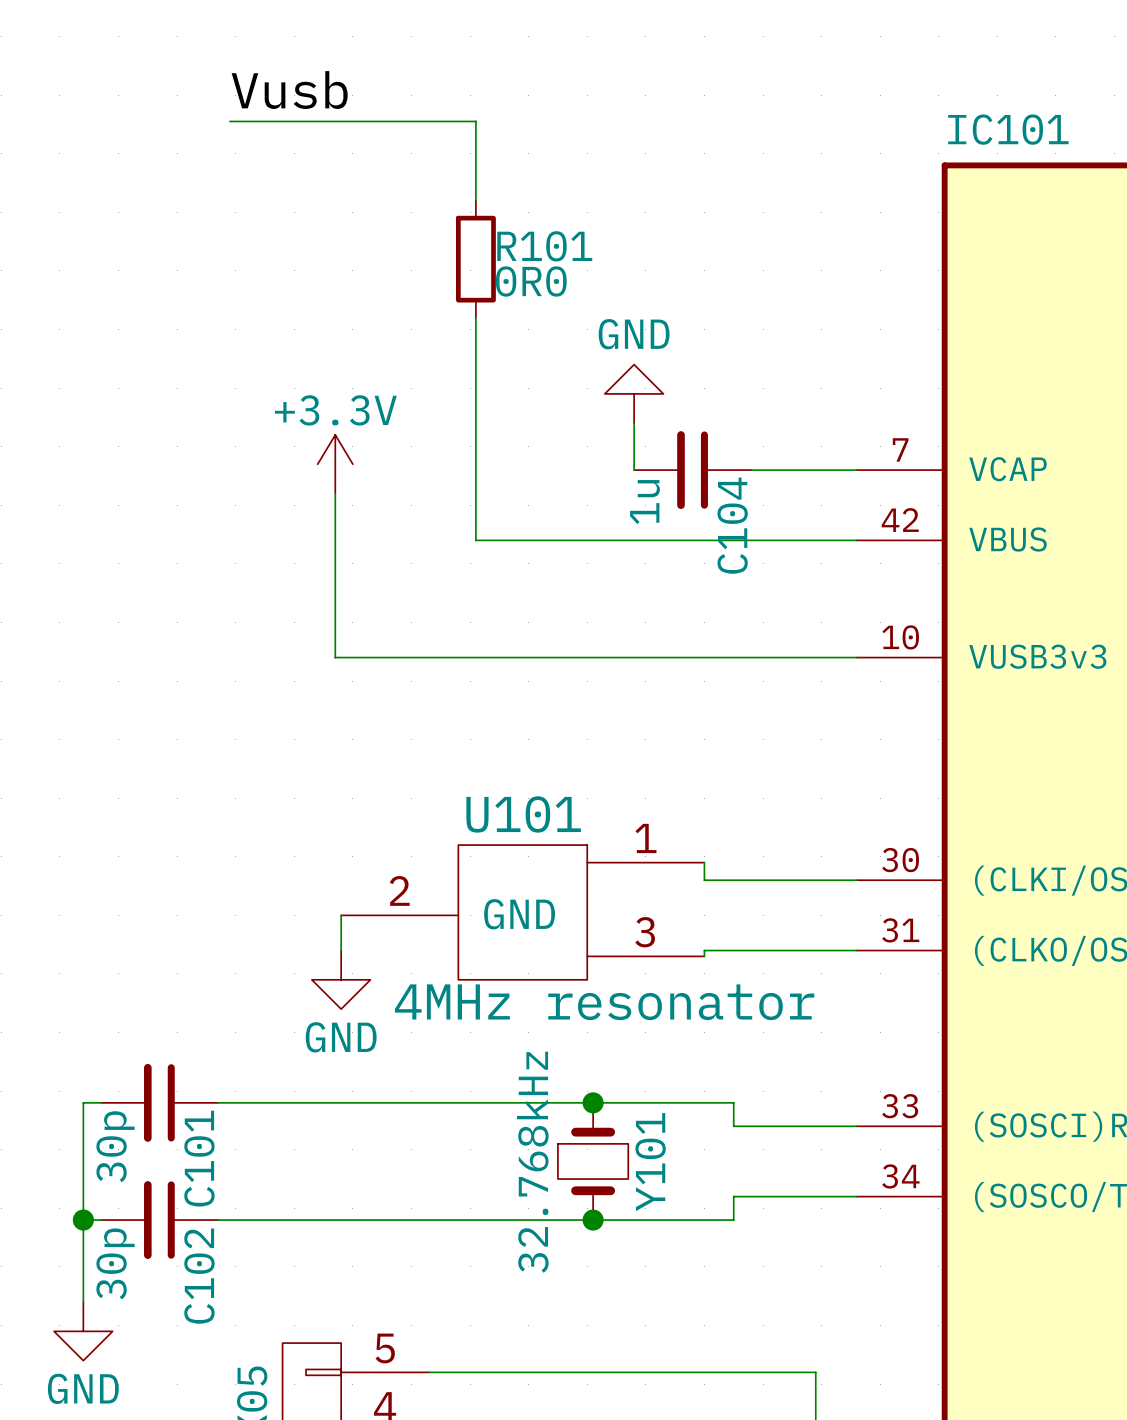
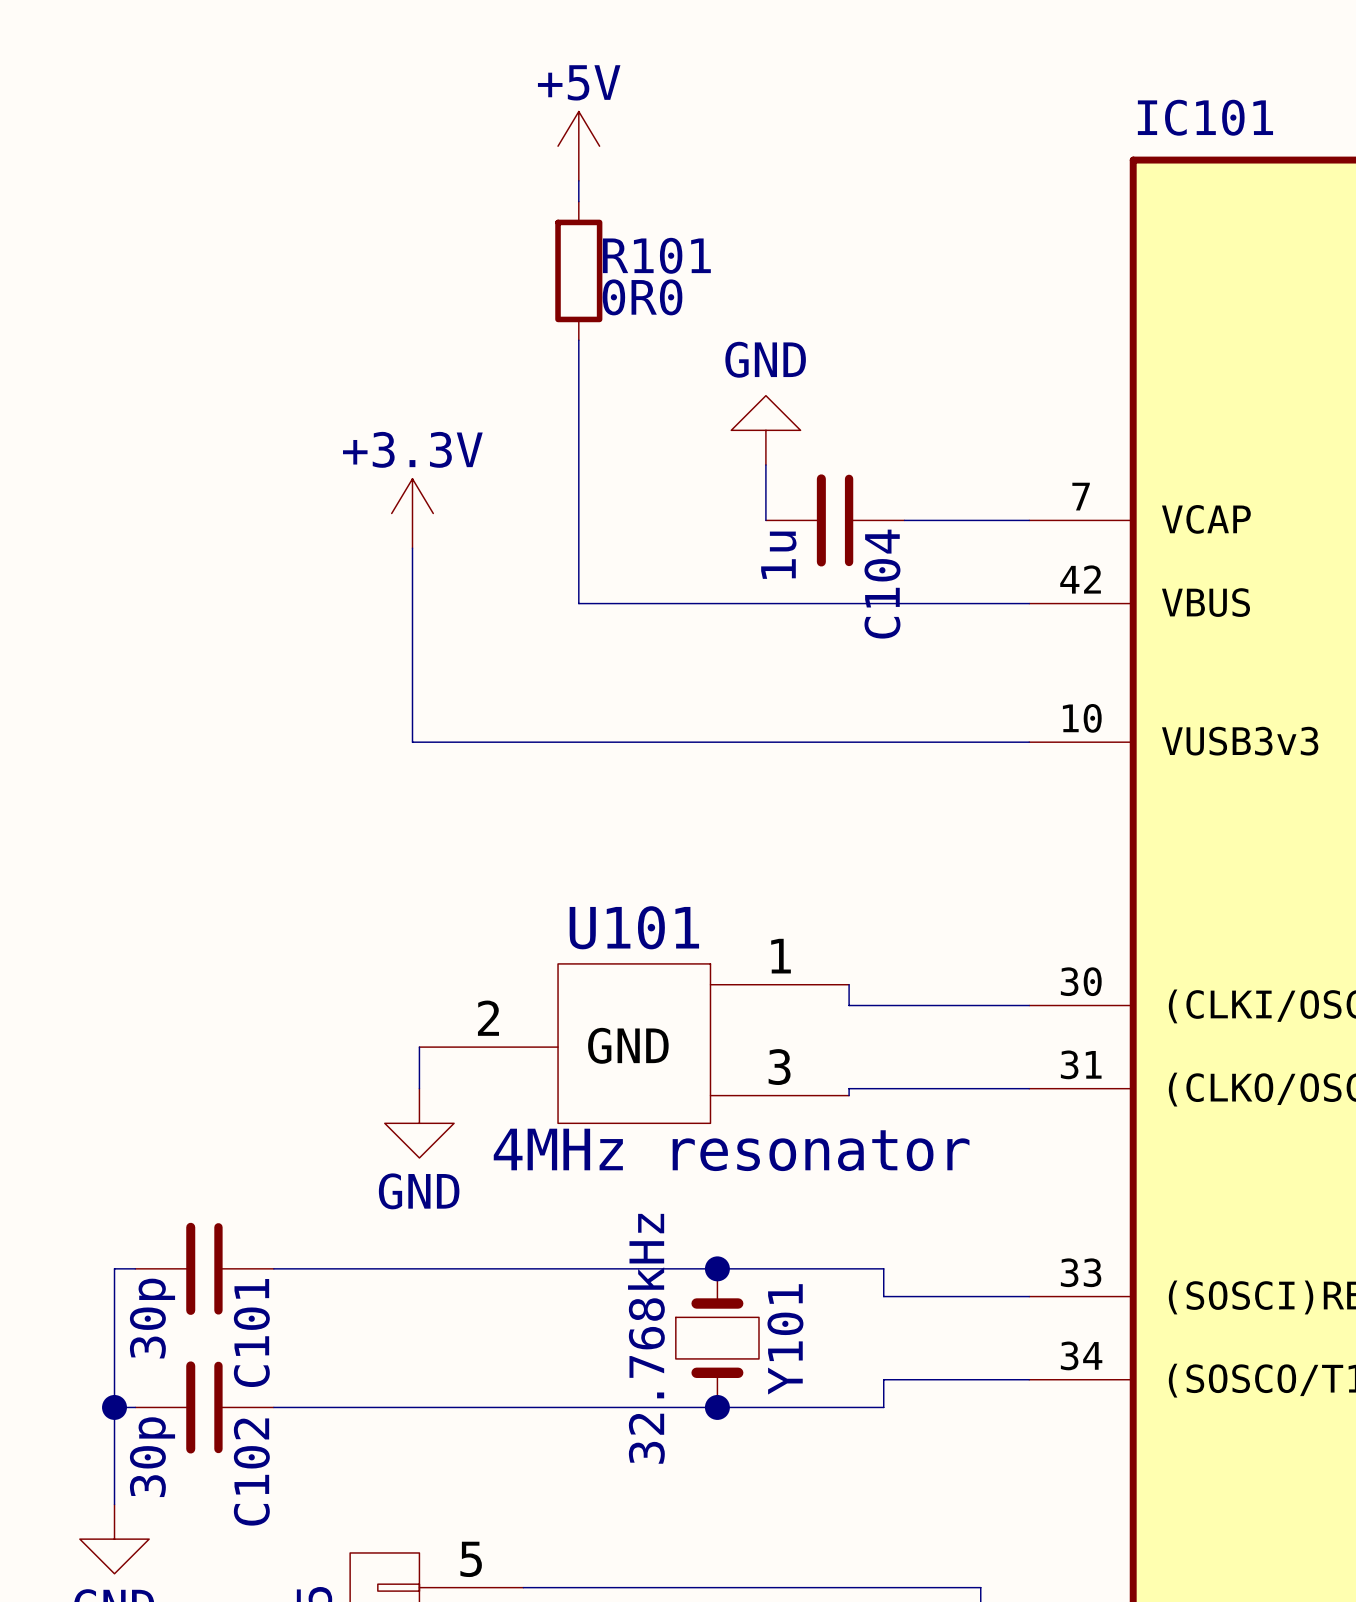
label: Vusb (289, 90) -> none
wire: (229, 121) (475, 121) (475, 182) -> none
power symbol: none -> +5V (578, 146)

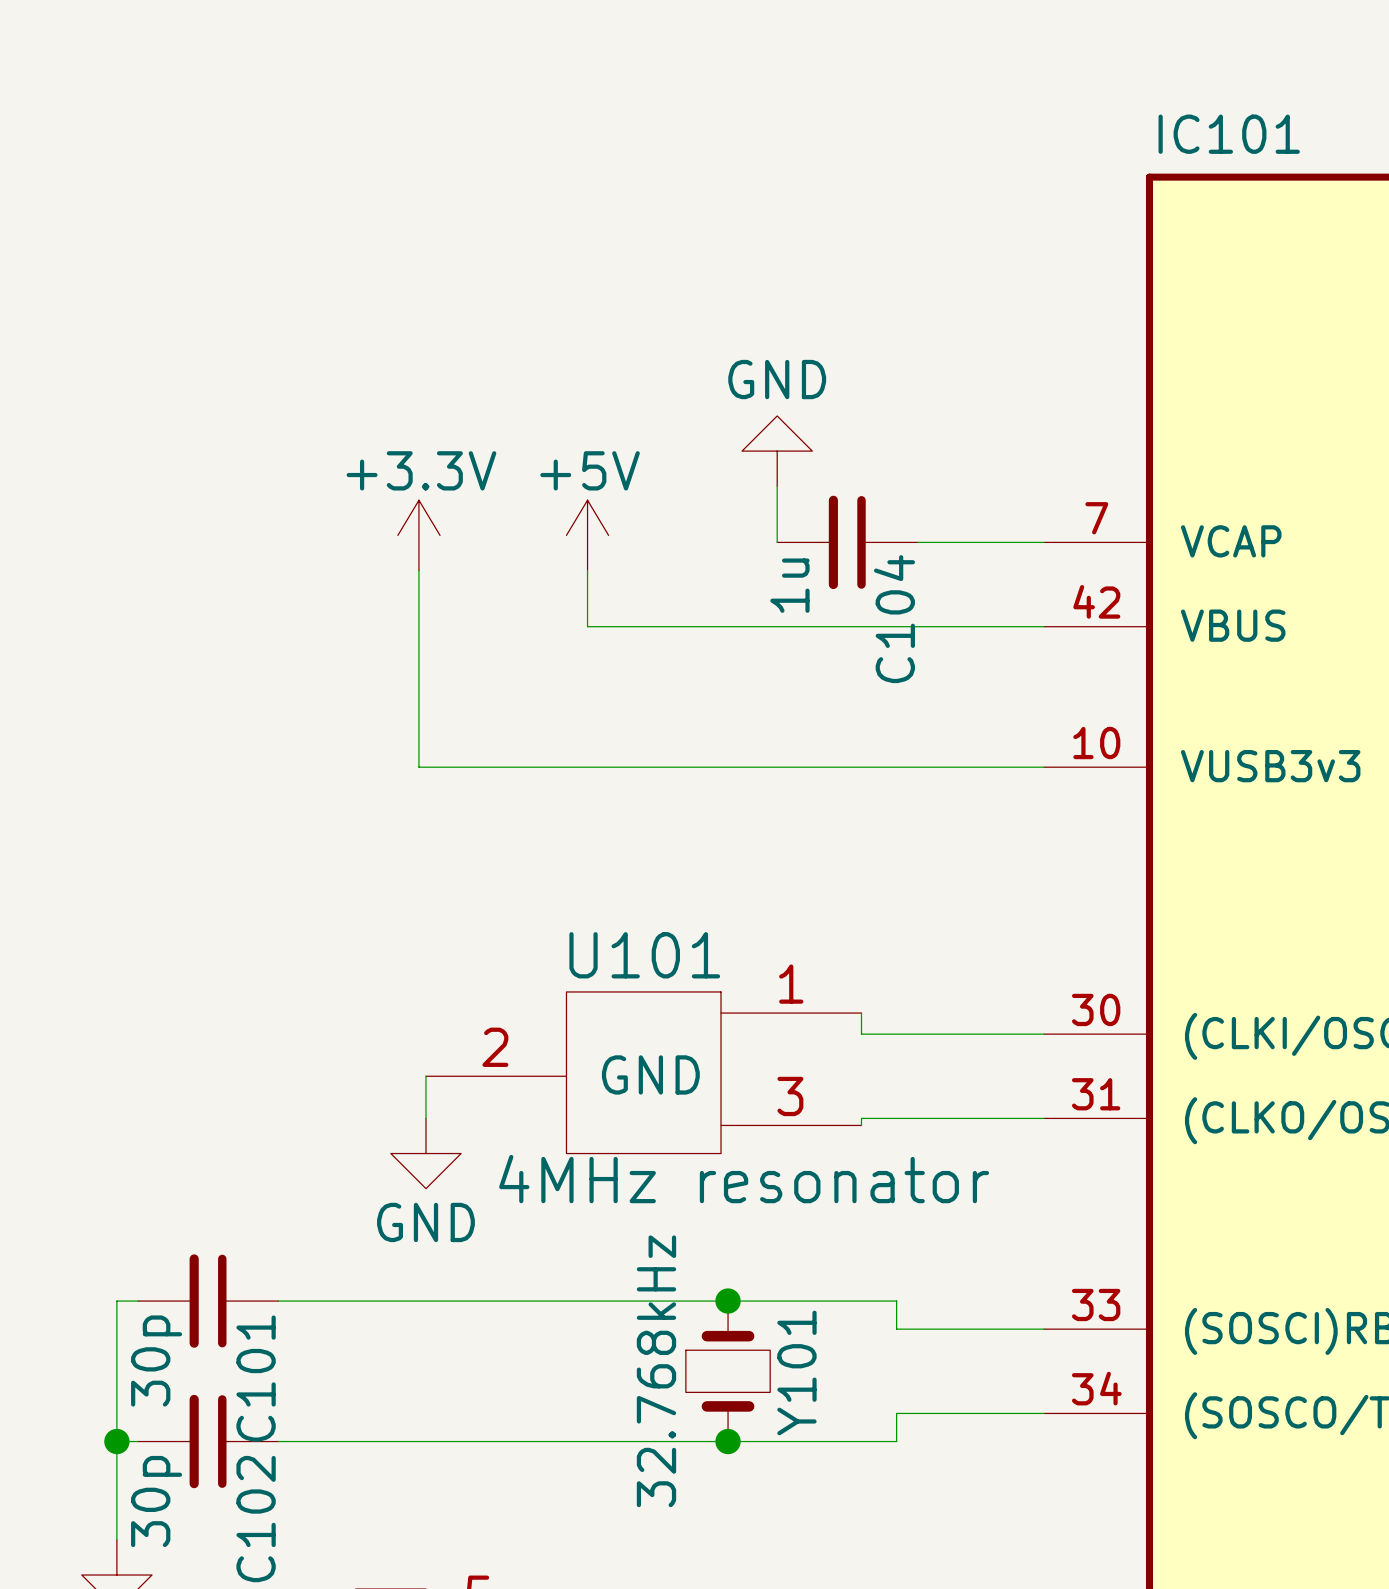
power symbol position: +5V (578, 146) -> +5V (587, 535)
wire: (578, 180) (578, 201) -> none
R101: 0R0 (578, 270) -> none
wire: (578, 340) (578, 548) -> none

